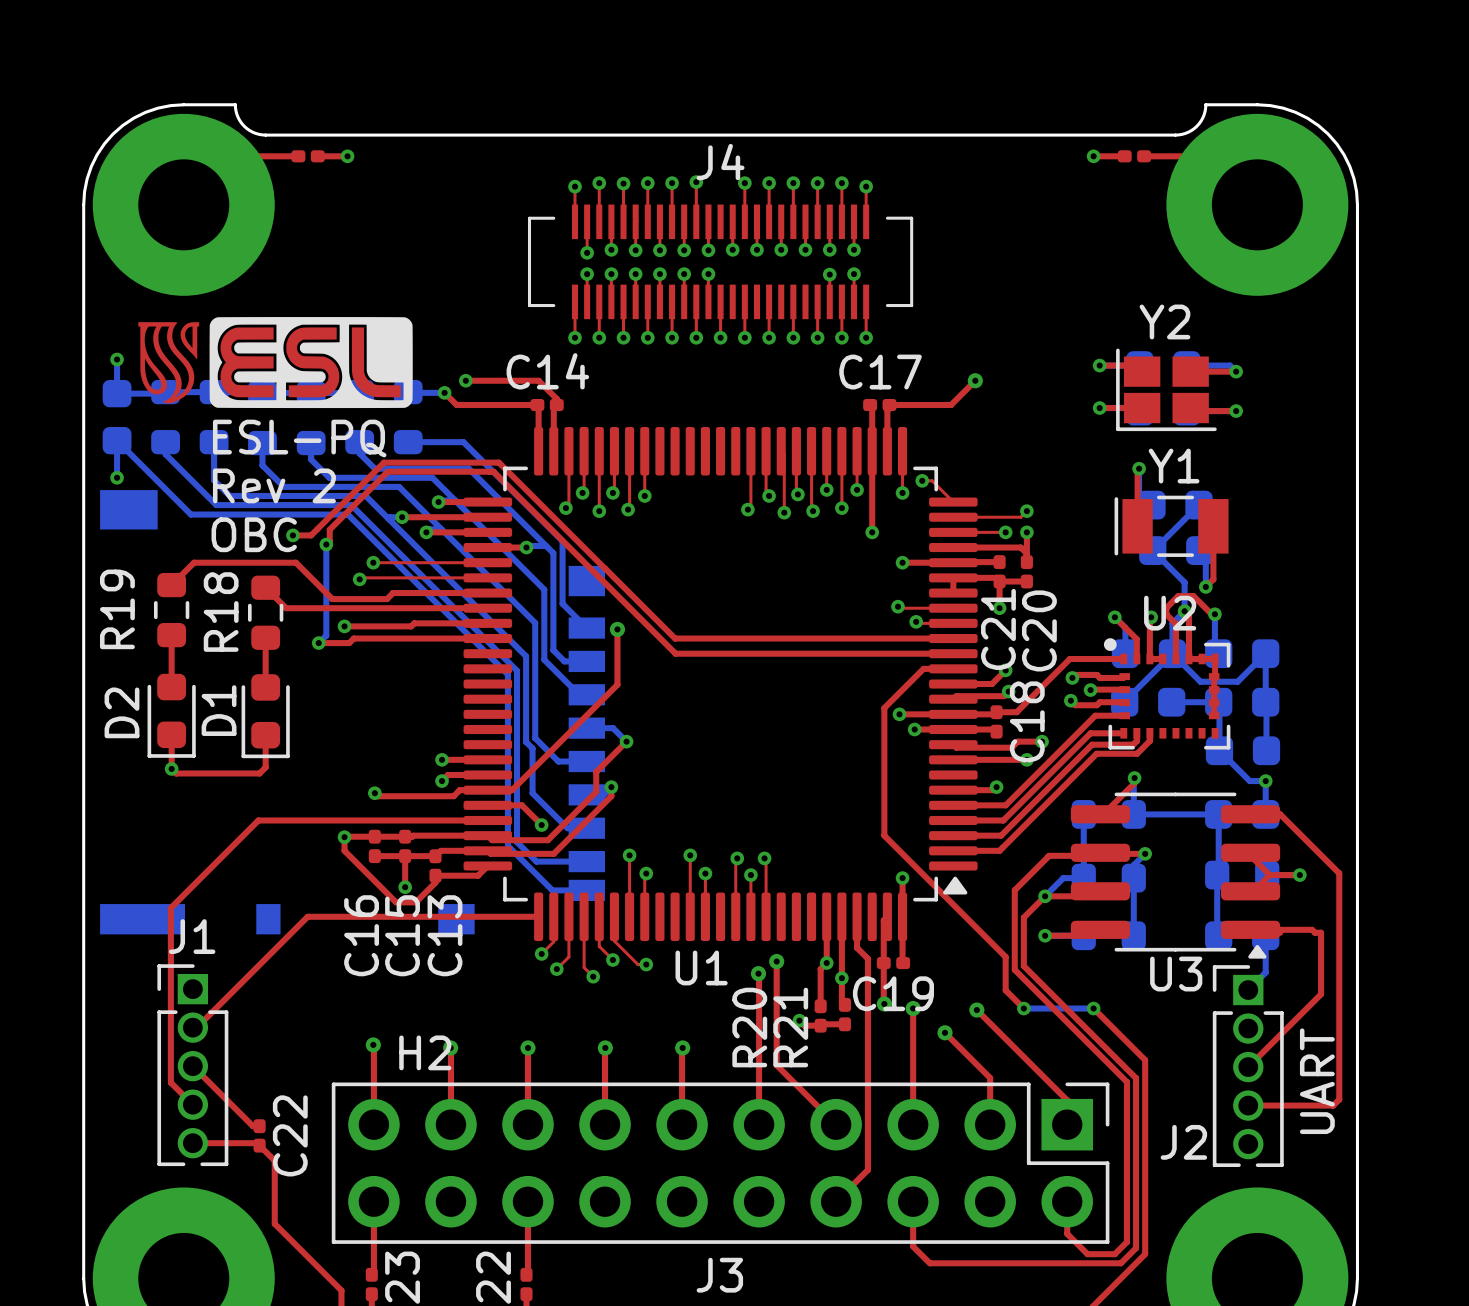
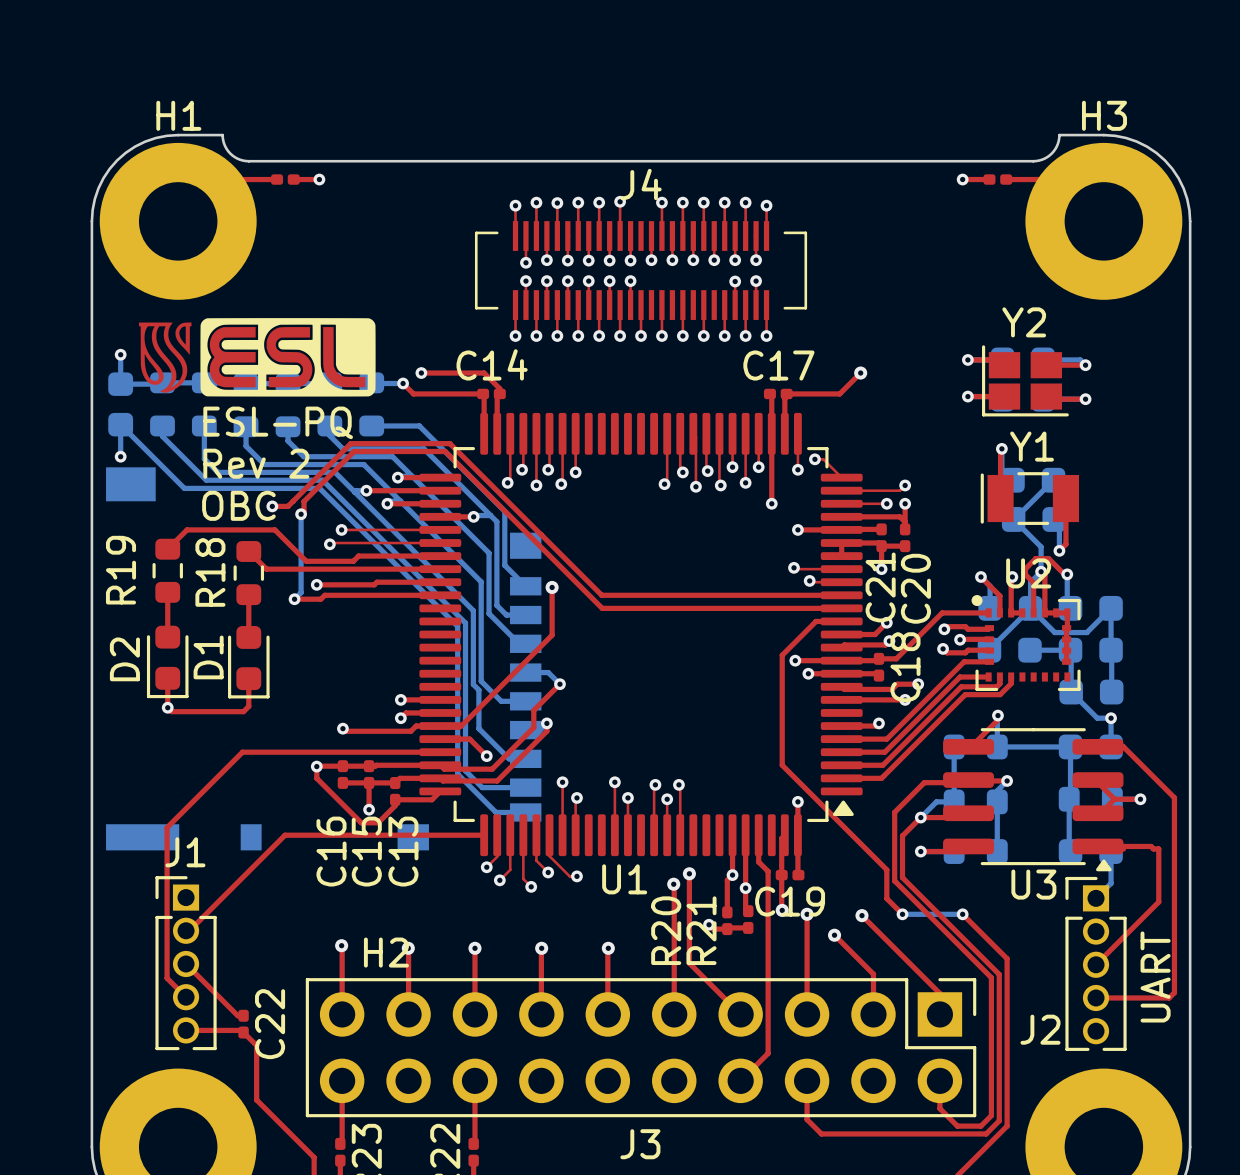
H1 name: none -> H1 (178, 115)
H3 name: none -> H3 (1104, 115)

